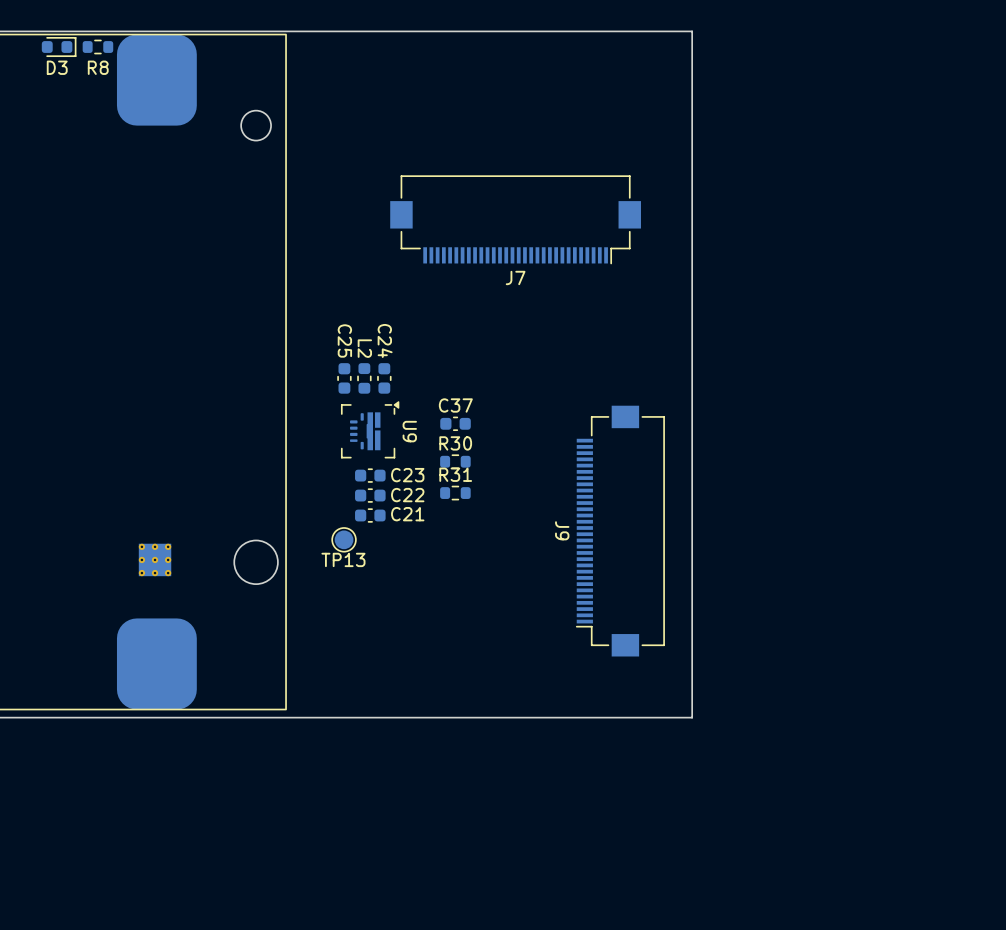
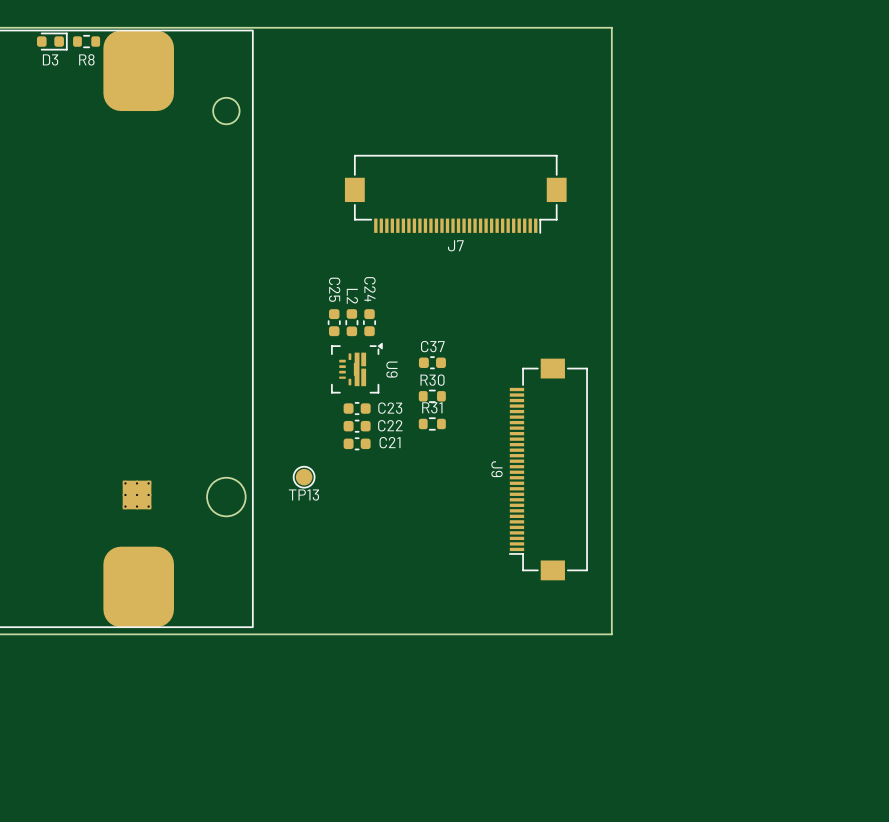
C25 position: (344, 378) -> (334, 322)
L2 position: (364, 378) -> (351, 322)
C24 position: (384, 378) -> (369, 322)
C37 position: (455, 423) -> (432, 362)
U9 position: (370, 429) -> (357, 368)
R30 position: (455, 461) -> (432, 396)
C23 position: (370, 475) -> (357, 408)
R31 position: (455, 493) -> (432, 423)
C22 position: (370, 495) -> (357, 426)
C21 position: (370, 515) -> (357, 443)

